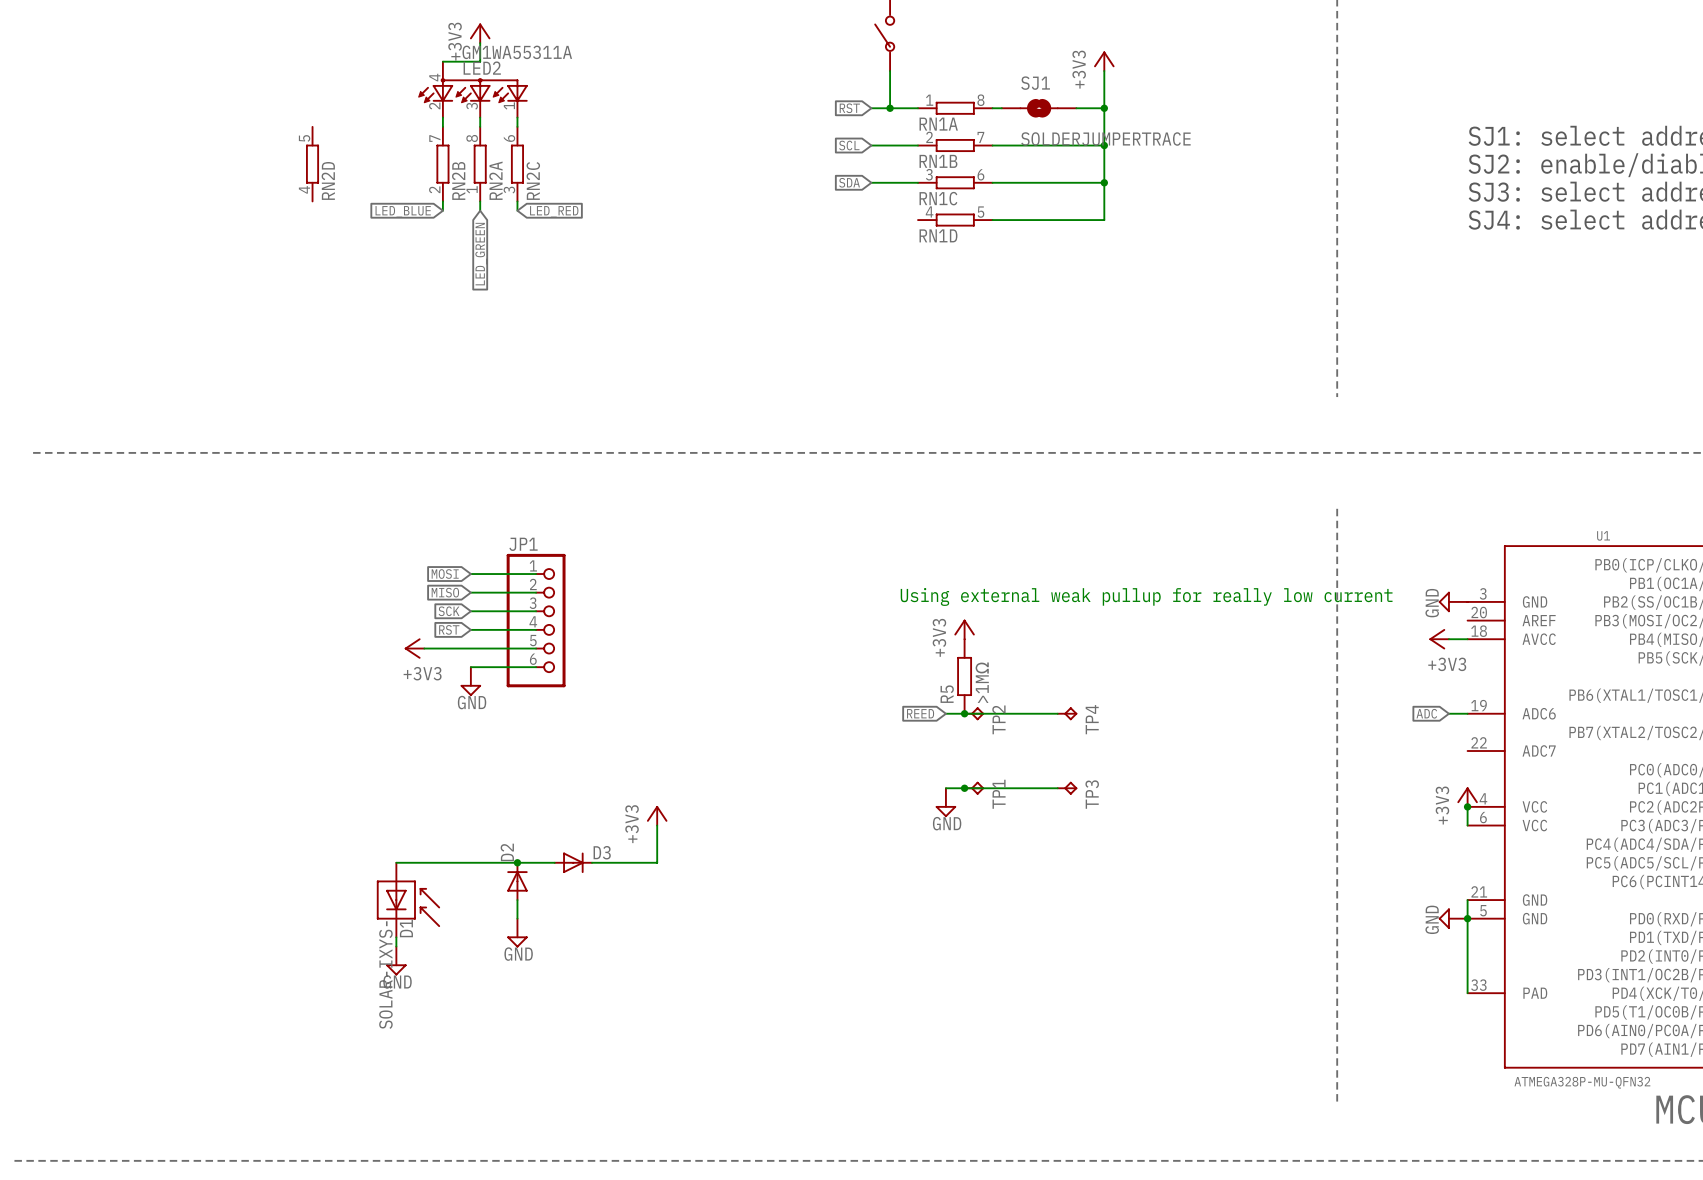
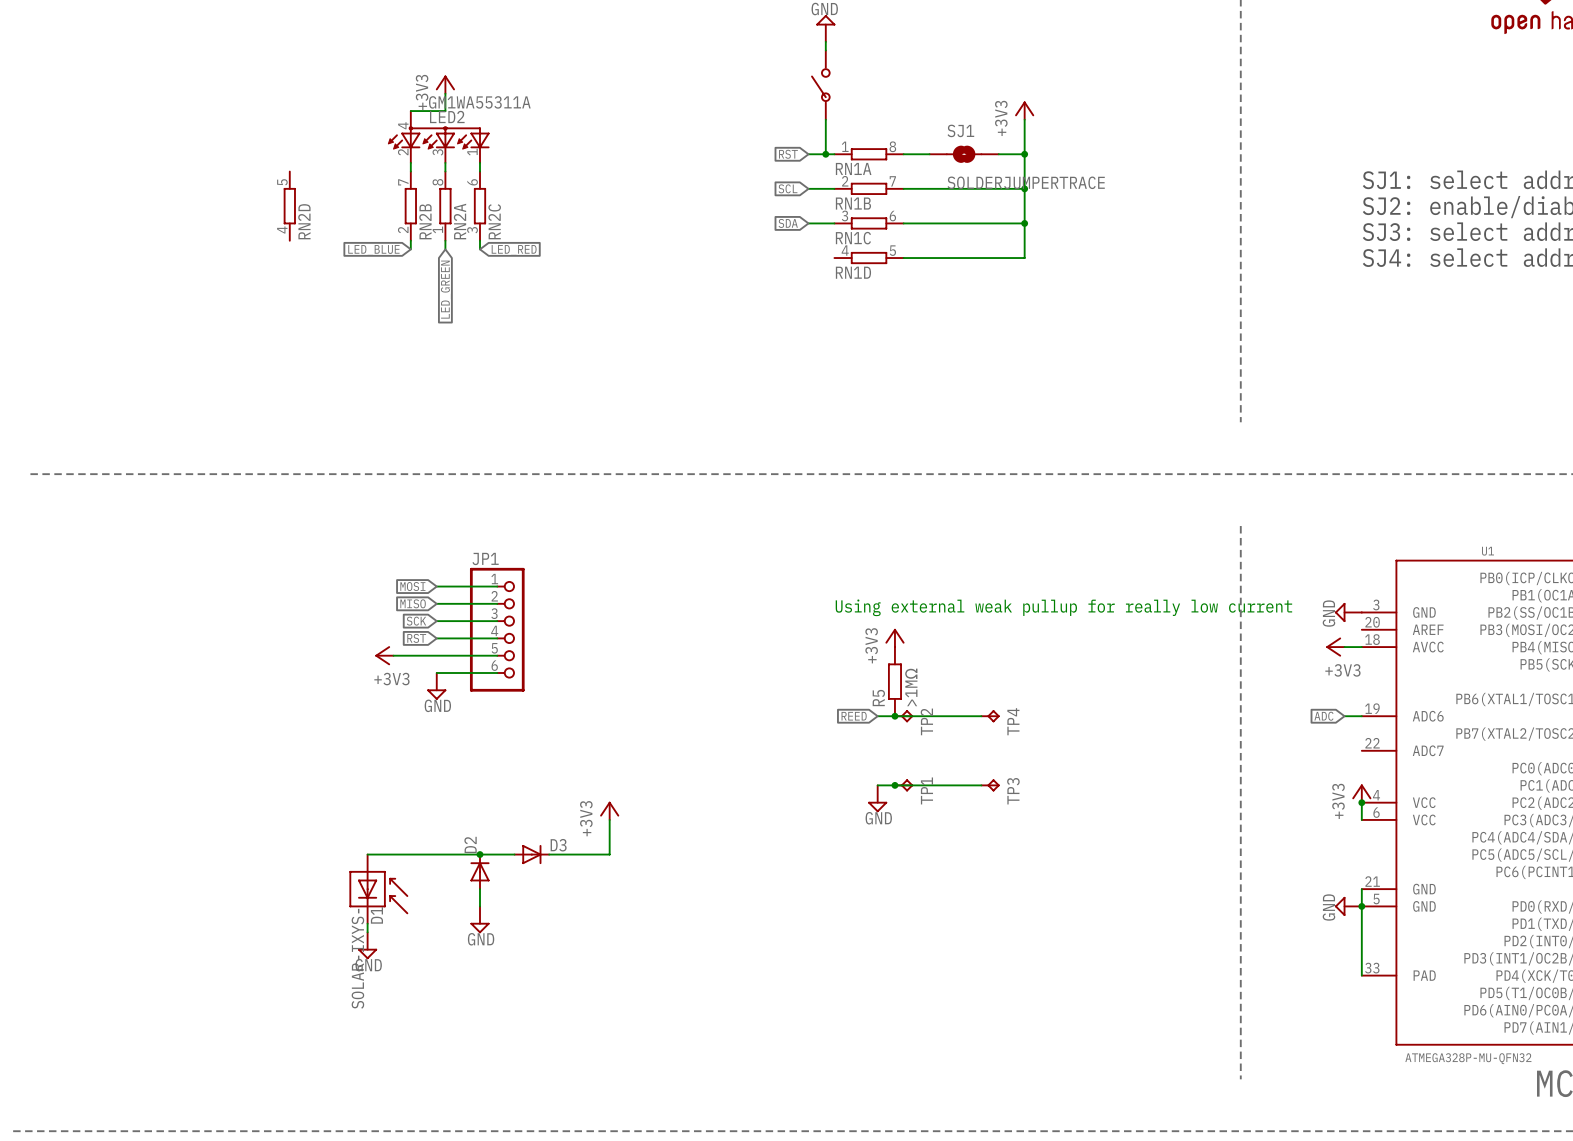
RN1A position: (955, 108) -> (869, 154)
RN1B position: (955, 145) -> (869, 188)
RN1C position: (955, 182) -> (869, 223)
RN1D position: (955, 220) -> (869, 258)

